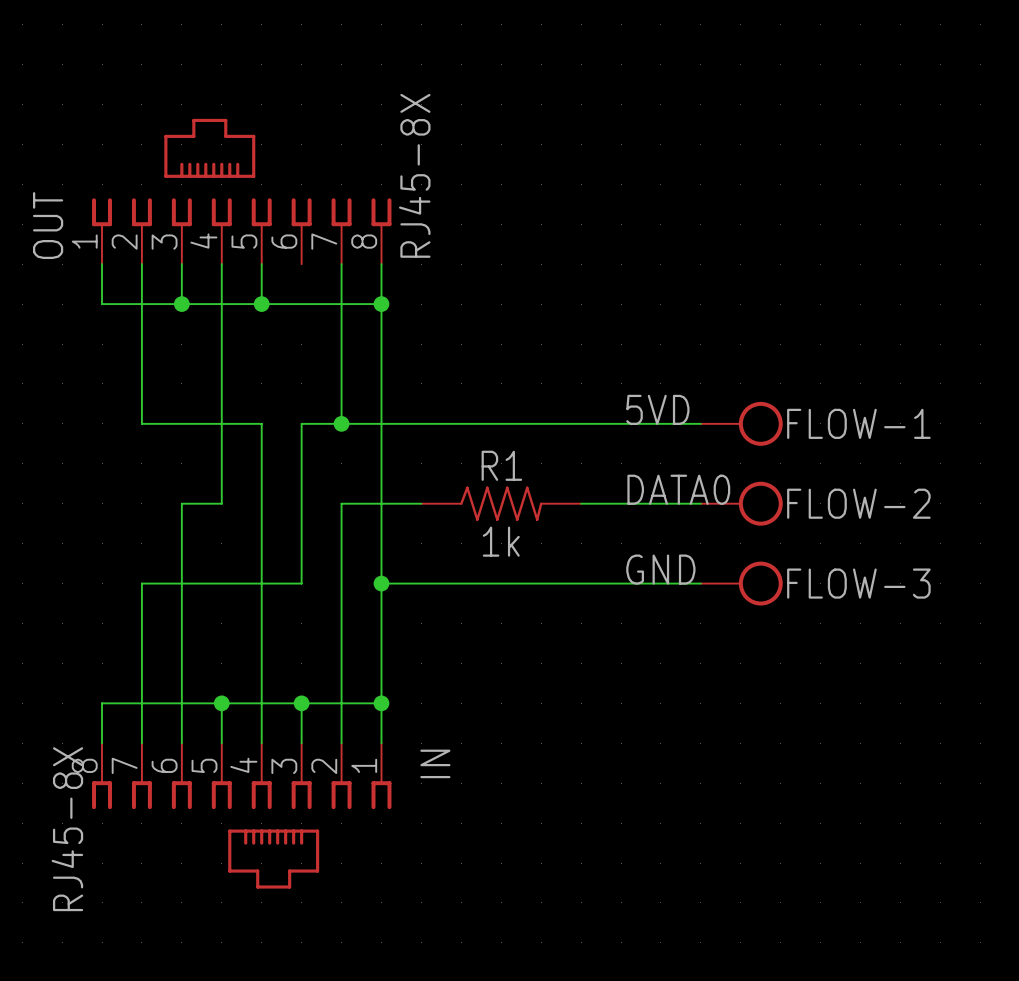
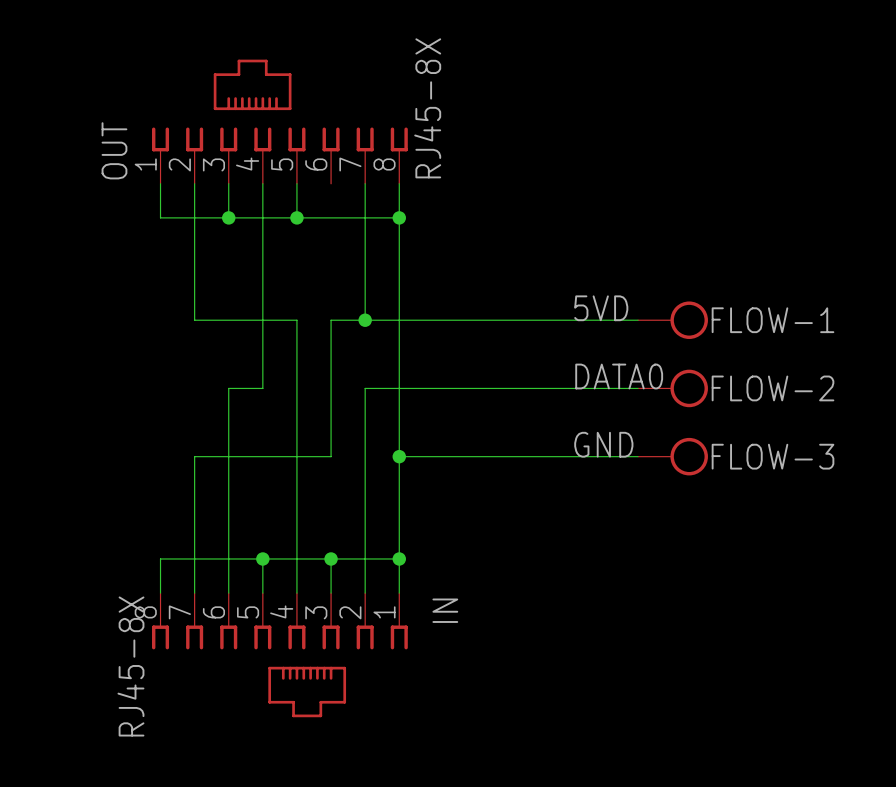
OUT position: (241, 191) -> (279, 121)
wire: (102, 264) (102, 304) (141, 304) (141, 423) (181, 423) -> (194, 217) (194, 320)
wire: none -> (296, 183) (296, 217)
wire: (341, 264) (341, 423) (301, 423) -> (262, 217) (262, 320) (296, 320)
wire: none -> (399, 183) (399, 593)
junction: (181, 304) -> none
wire: (221, 304) (221, 503) (181, 503) (181, 583) (141, 583) (141, 703) (102, 703) (102, 743) -> none
junction: none -> (228, 217)
junction: (261, 304) -> none
junction: none -> (296, 217)
wire: none -> (365, 217) (399, 217)
junction: (381, 304) -> none
junction: none -> (399, 217)
junction position: (341, 423) -> (365, 320)
wire: (381, 423) (381, 503) (341, 503) -> (331, 320) (331, 388)
wire: (261, 503) (261, 703) -> (262, 388) (228, 388) (228, 558)
R1: 1k (501, 503) -> none
wire: (341, 583) (341, 703) -> (331, 456) (296, 456) (296, 558)
wire: (381, 583) (421, 583) -> (365, 558) (399, 558)
junction position: (381, 583) -> (399, 456)
junction: (221, 703) -> none
junction: none -> (262, 558)
junction: (301, 703) -> none
junction: none -> (331, 558)
junction: (381, 703) -> none
junction: none -> (399, 558)
IN position: (241, 815) -> (279, 655)

